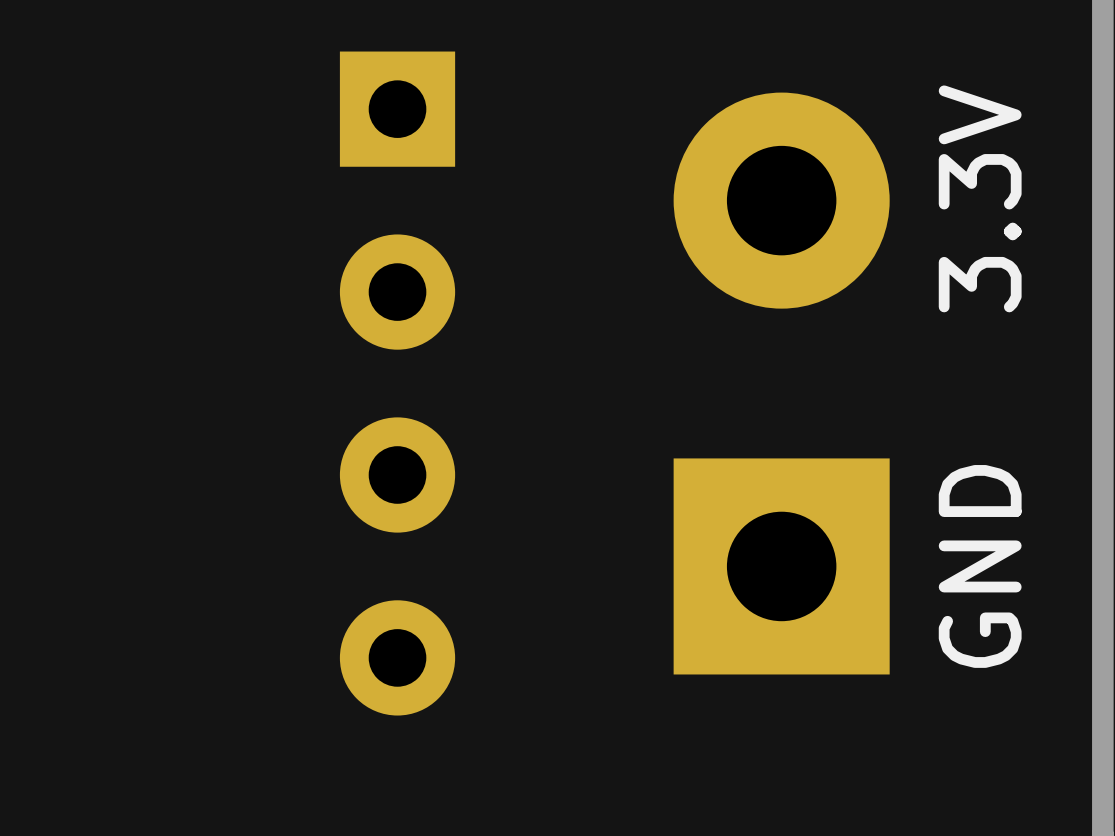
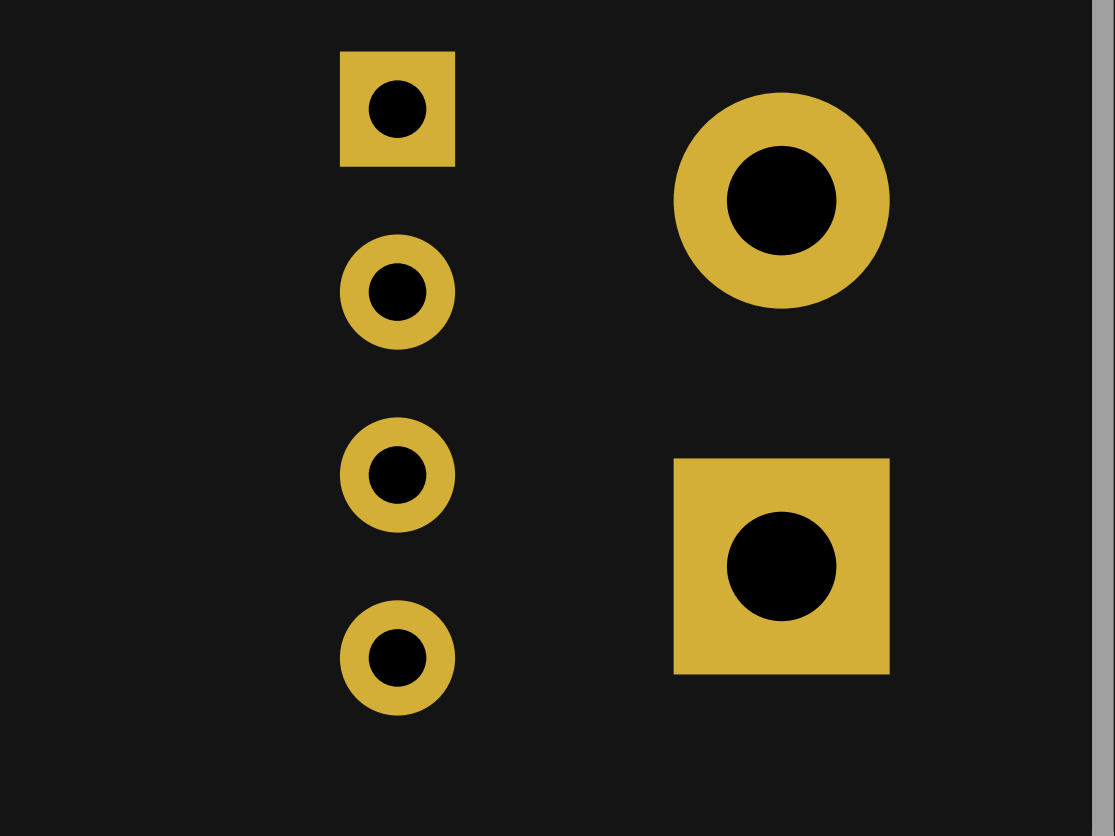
text: 3.3V (980, 198) -> none
text: GND (980, 566) -> none

